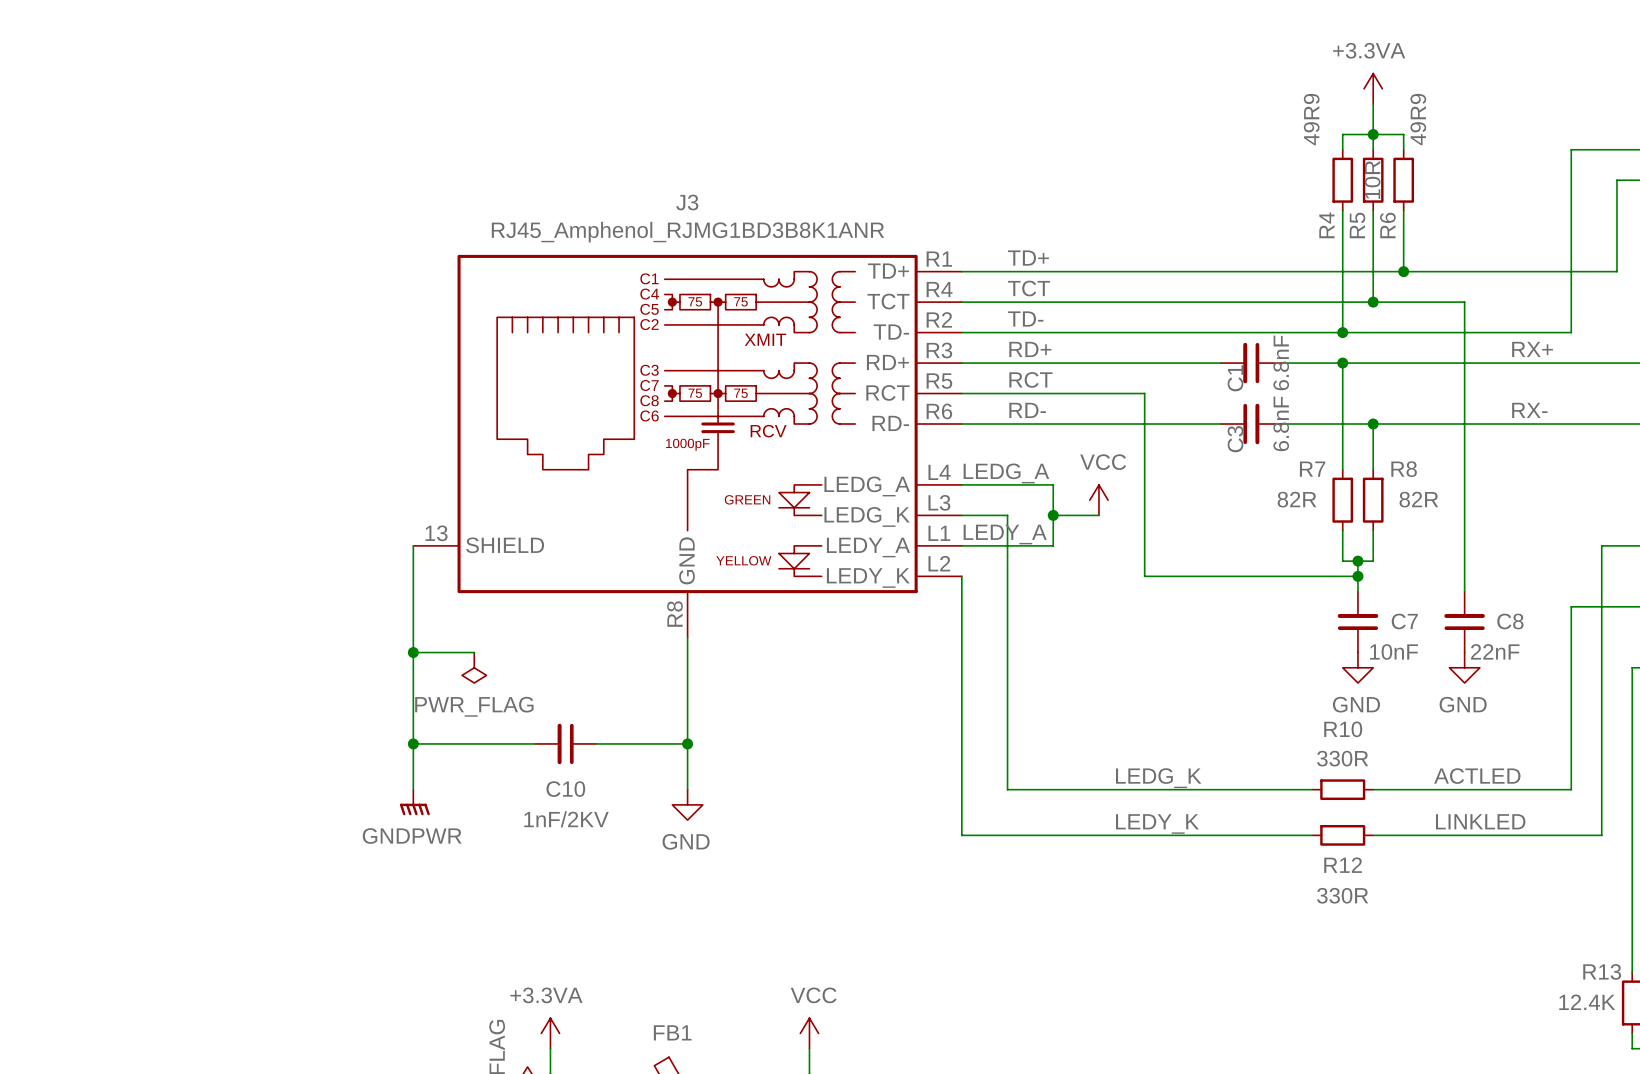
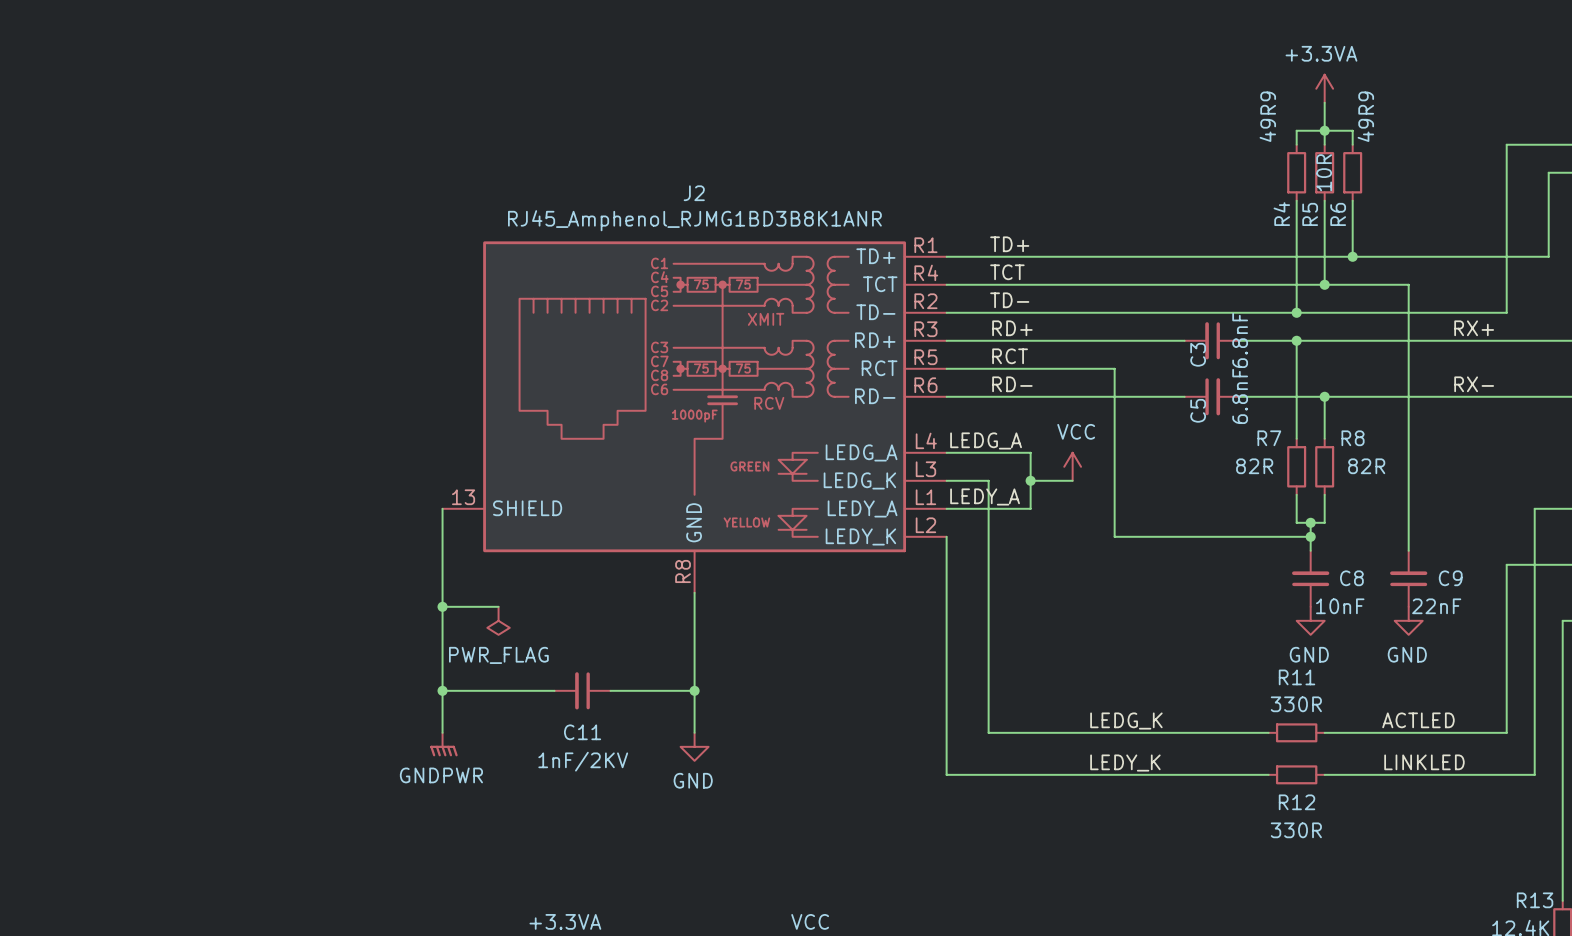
J3 name: J3 (687, 202) -> J2 (694, 193)
C1 name: C1 (1235, 378) -> C3 (1198, 354)
C3 name: C3 (1235, 439) -> C5 (1198, 410)
C7 name: C7 (1404, 621) -> C8 (1351, 578)
C8 name: C8 (1510, 621) -> C9 (1450, 578)
R10 name: R10 (1343, 729) -> R11 (1297, 677)
C10 name: C10 (565, 789) -> C11 (582, 732)

